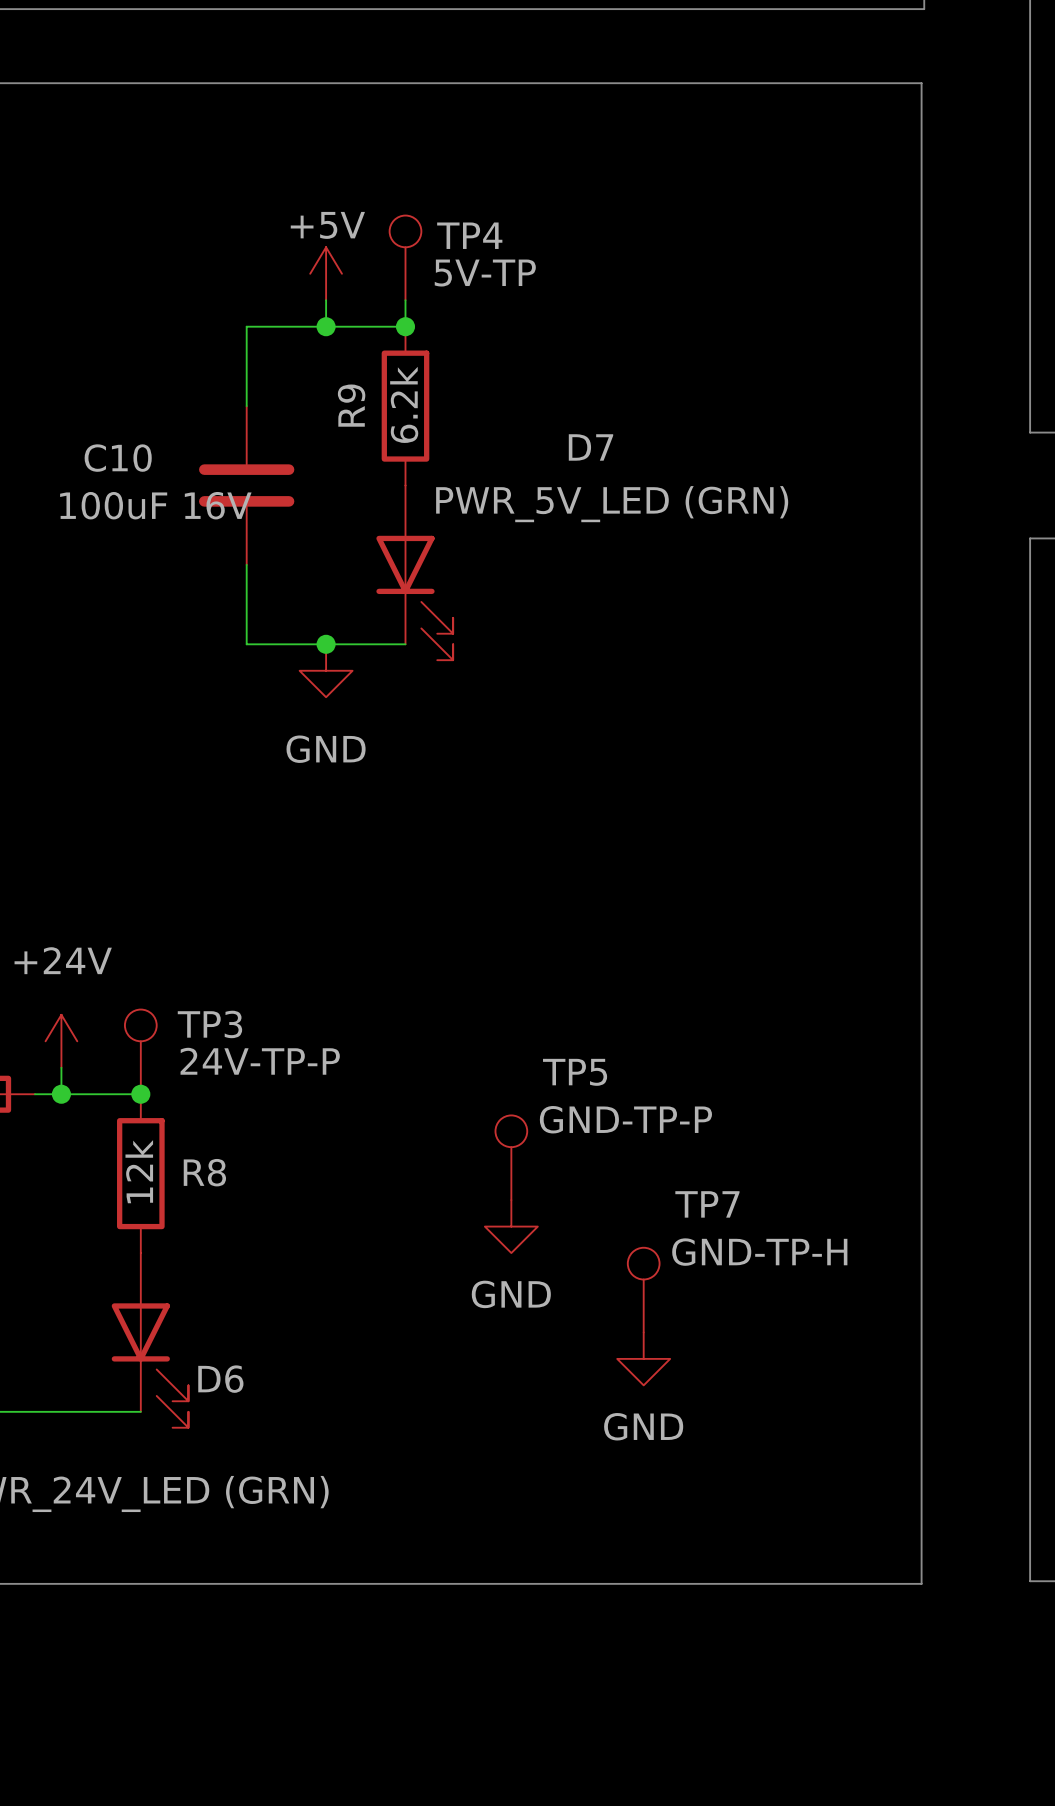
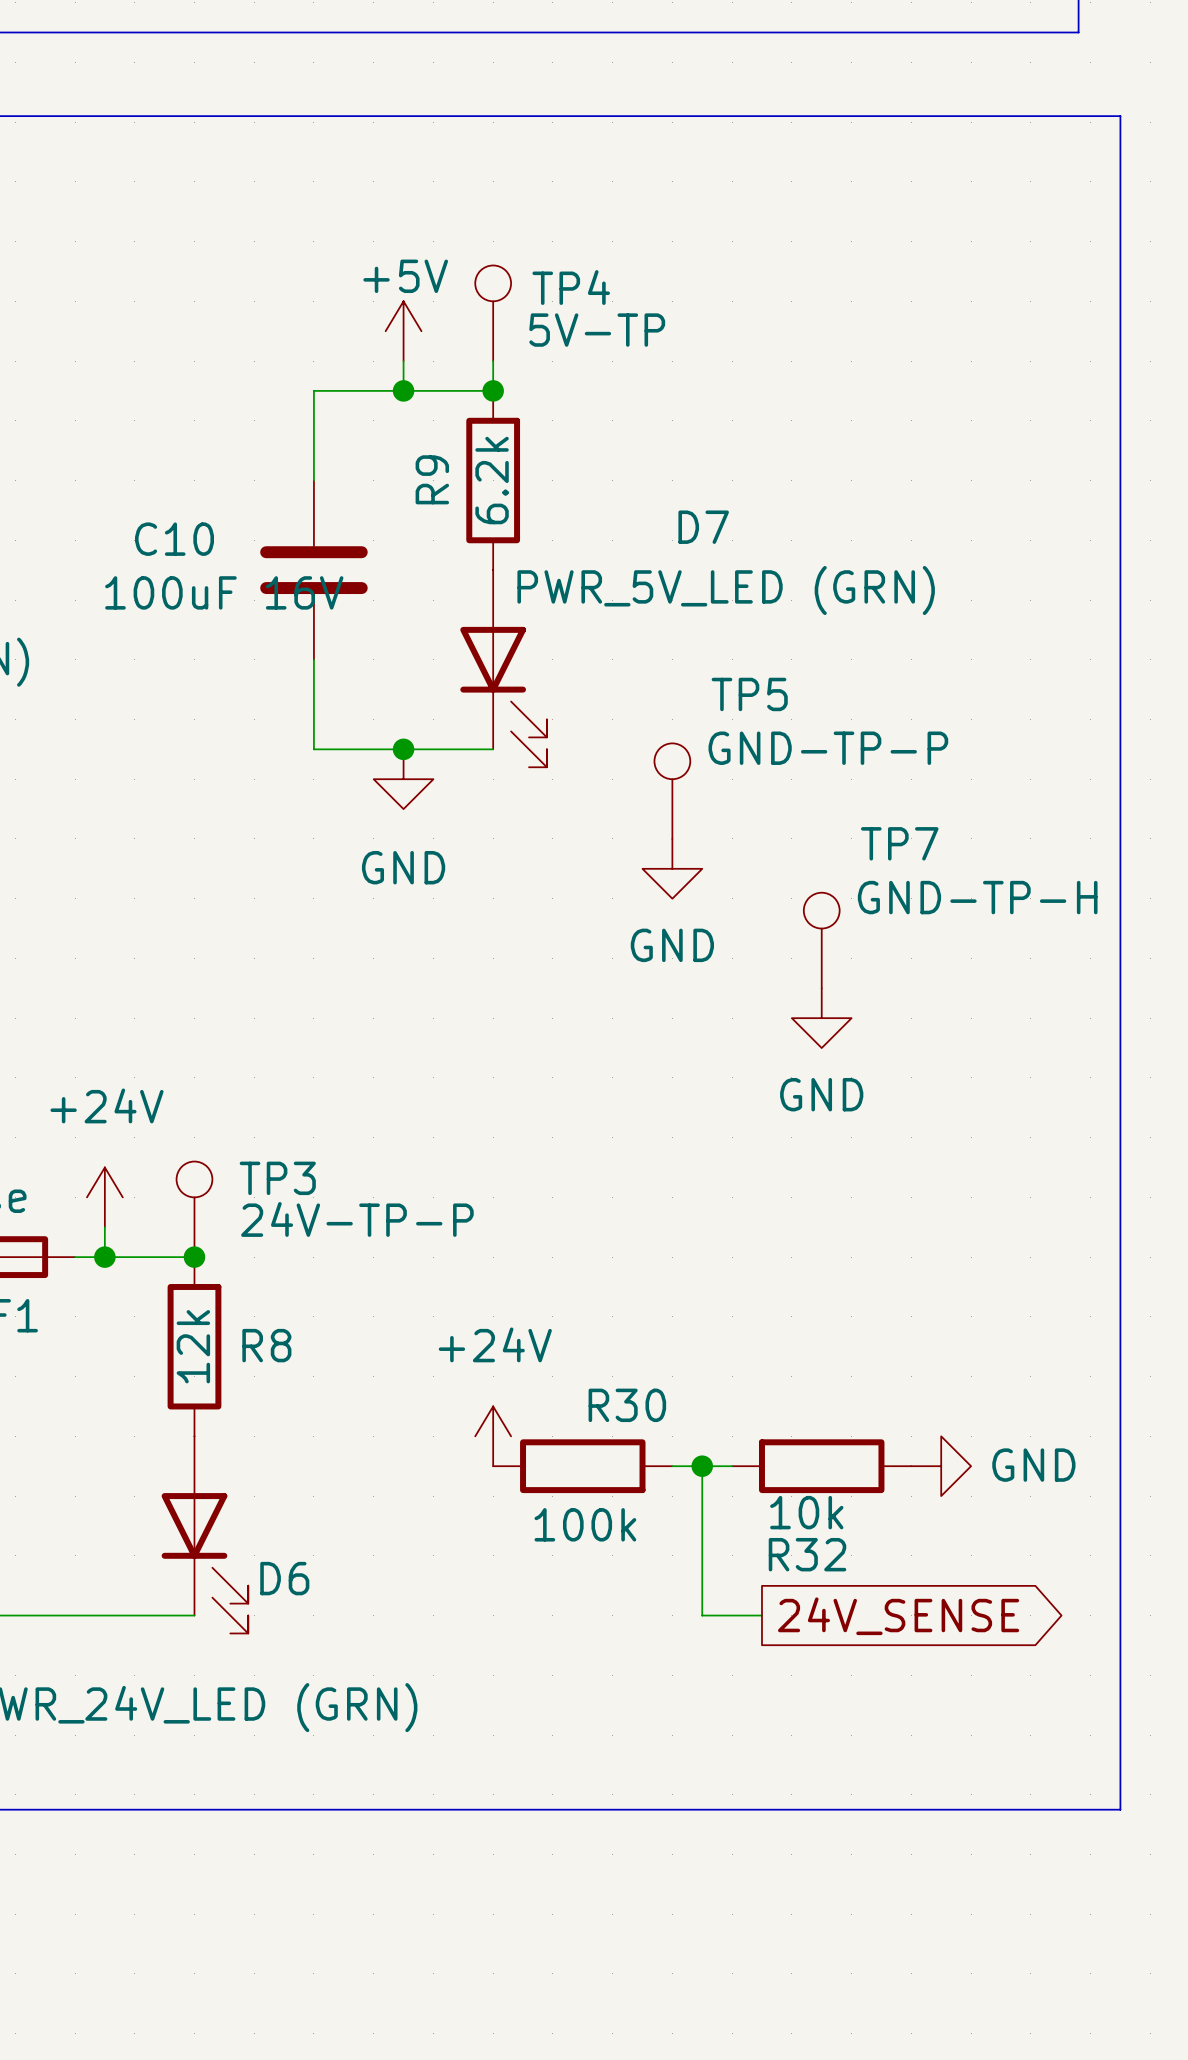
line: (921, 83) (921, 1583) -> (1075, 116) (1120, 116) (1120, 1809) (1075, 1809)
power symbol: none -> GND (672, 868)
power symbol: none -> GND (821, 1018)
TP5 position: (511, 1157) -> (672, 791)
power symbol: GND (511, 1226) -> none
power symbol: none -> +24V (493, 1436)
R30: none -> 100k (582, 1466)
wire: none -> (672, 1466) (732, 1466)
wire: none -> (702, 1466) (702, 1615) (761, 1615)
junction: none -> (702, 1466)
R32: none -> 10k (821, 1466)
power symbol: none -> GND (941, 1466)
TP7 position: (643, 1290) -> (821, 940)
power symbol: GND (643, 1358) -> none
global label: none -> 24V_SENSE (898, 1616)

